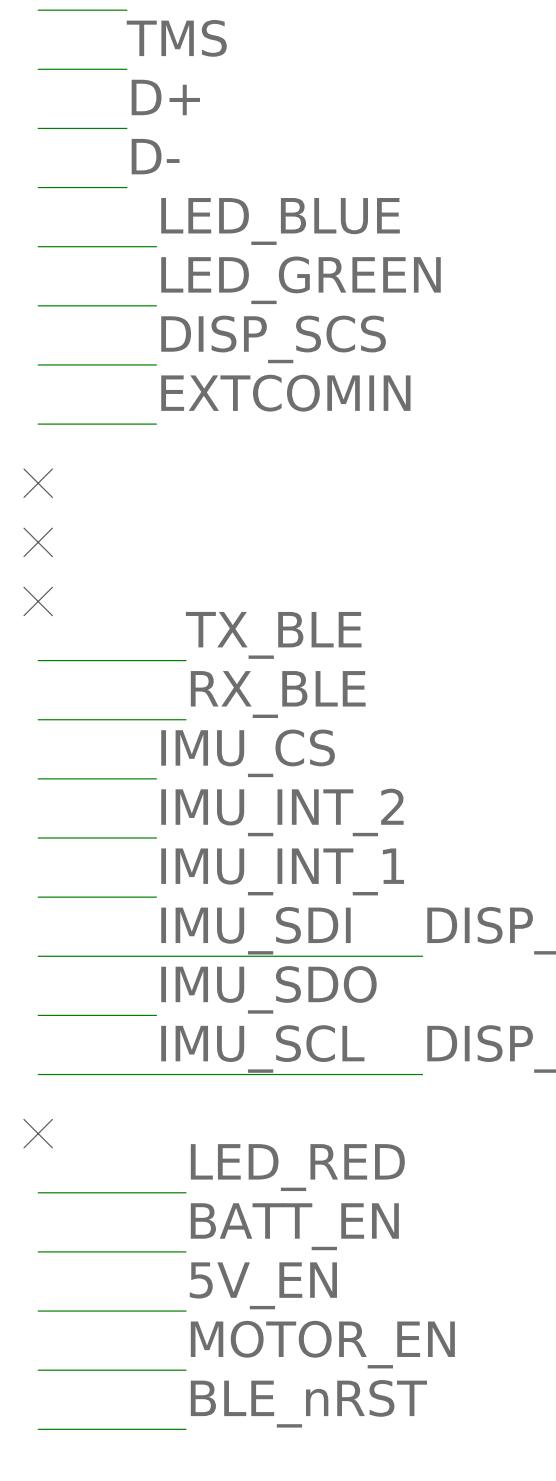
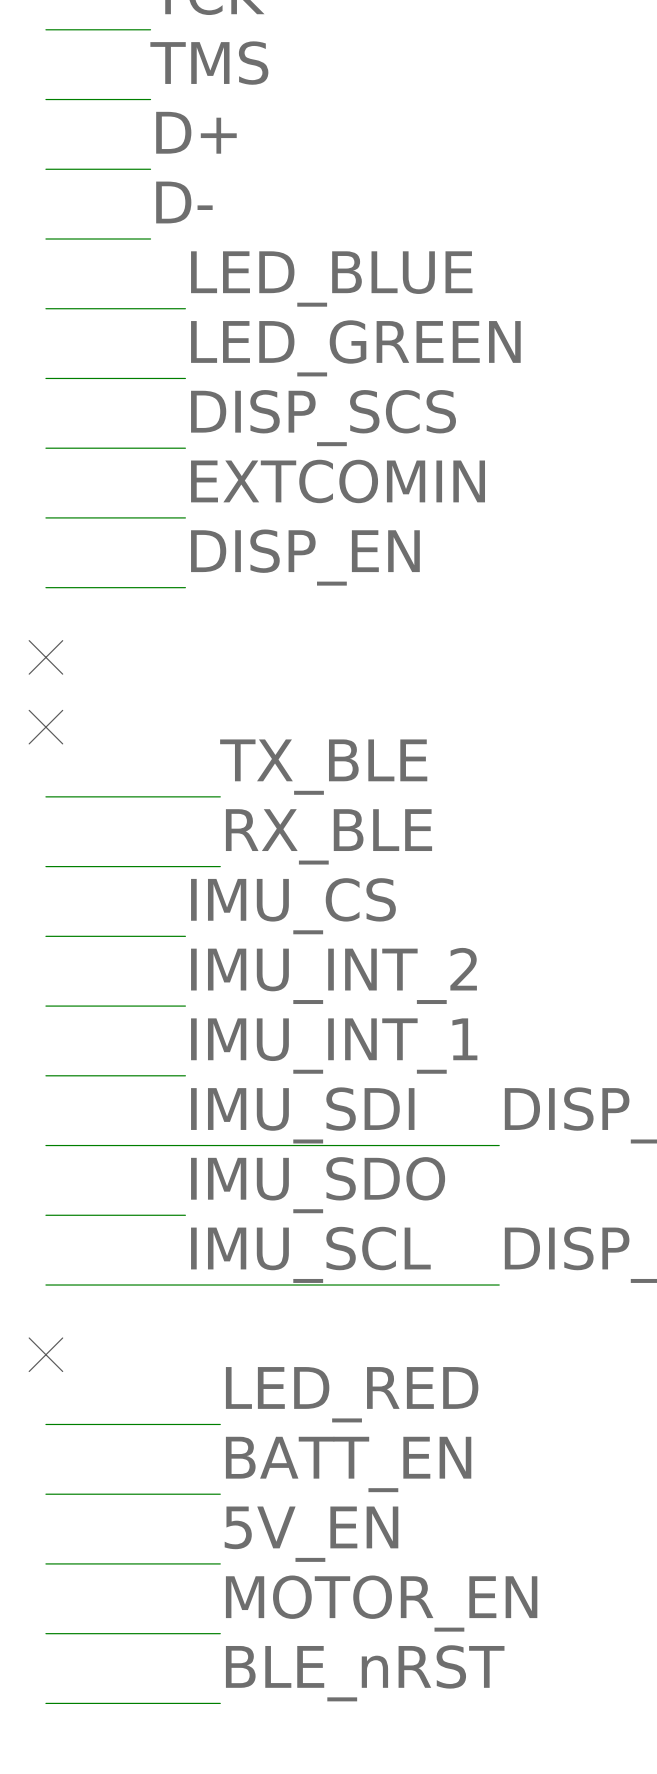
label: none -> DISP_EN (305, 557)
wire: none -> (45, 587) (185, 587)
no-connect mark: (38, 483) -> none

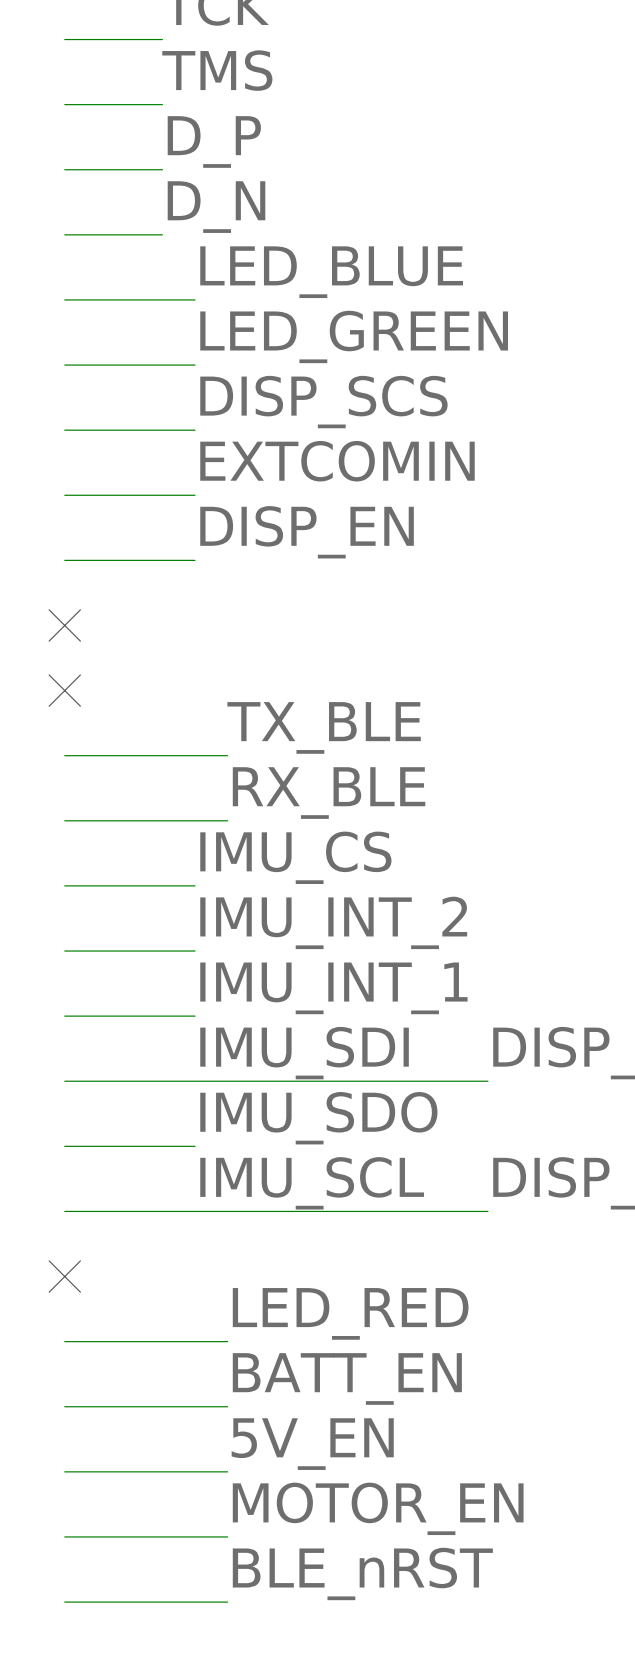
label: D+ (196, 132) -> D_P (214, 141)
label: D- (184, 202) -> D_N (216, 207)

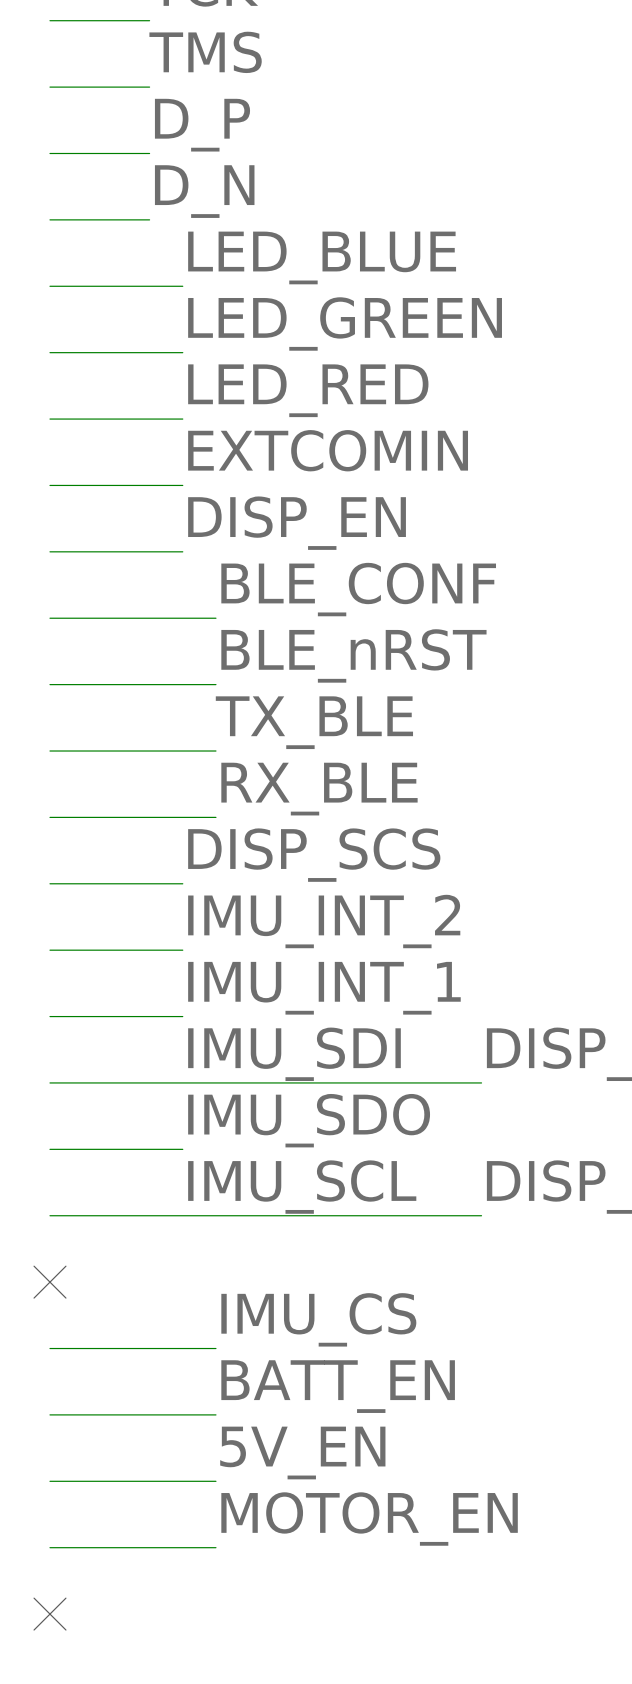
label: DISP_SCS (323, 402) -> LED_RED (308, 390)
label: none -> BLE_CONF (358, 589)
wire: none -> (49, 618) (215, 618)
no-connect mark: (64, 625) -> none
label: none -> BLE_nRST (353, 655)
wire: none -> (49, 684) (215, 684)
no-connect mark: (64, 690) -> none
label: IMU_CS (295, 857) -> DISP_SCS (314, 855)
label: LED_RED (350, 1313) -> IMU_CS (318, 1319)
label: BLE_nRST (362, 1573) -> none
wire: (64, 1602) (227, 1602) -> none
no-connect mark: none -> (49, 1614)

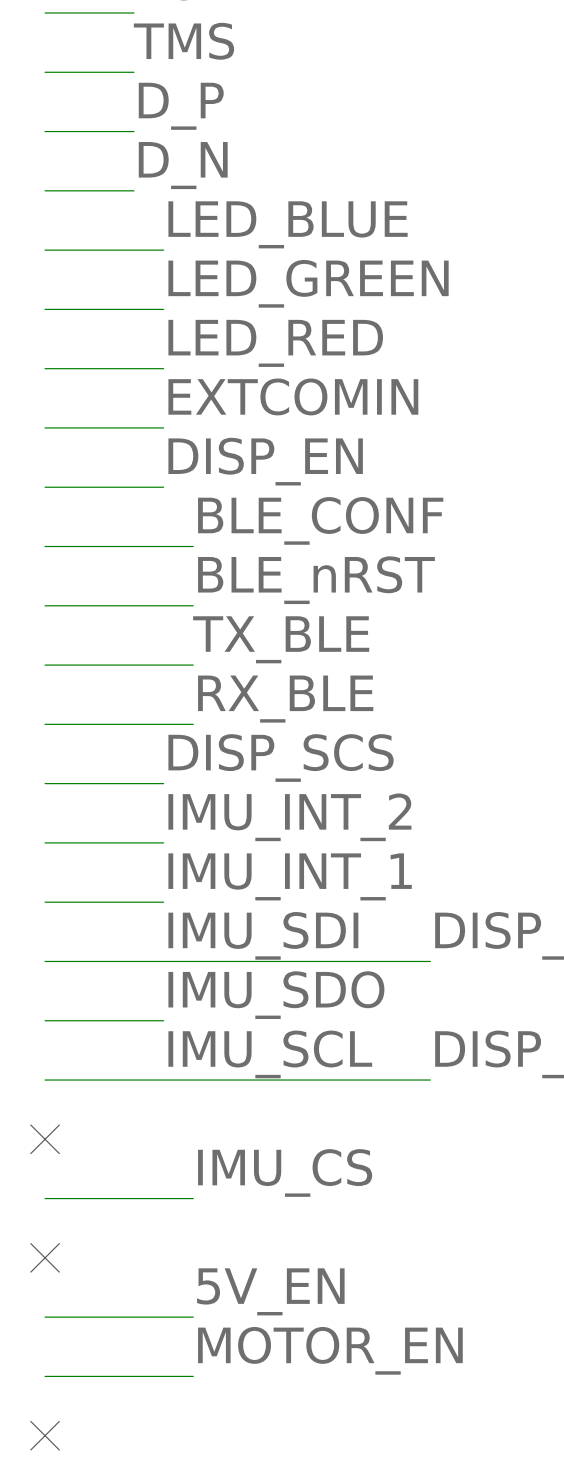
label: BATT_EN (338, 1386) -> none
wire: (49, 1414) (215, 1414) -> none
no-connect mark: none -> (45, 1257)

